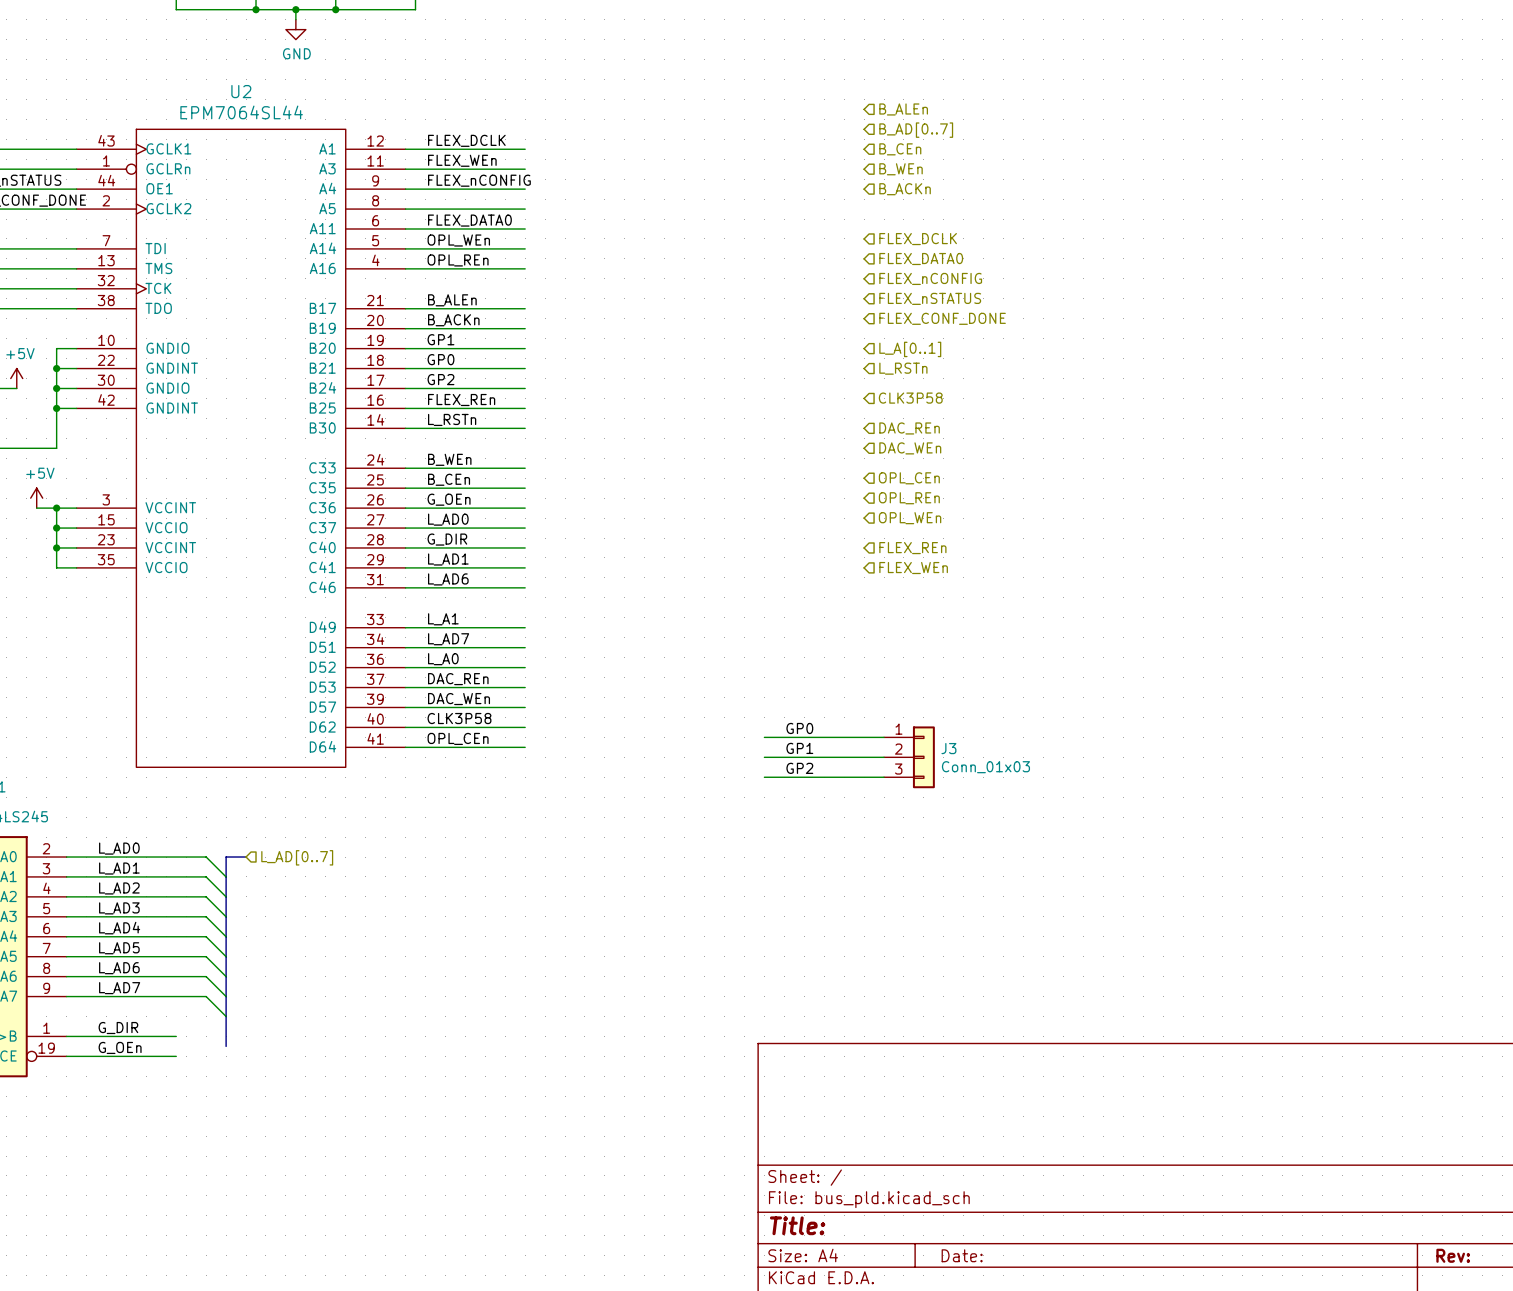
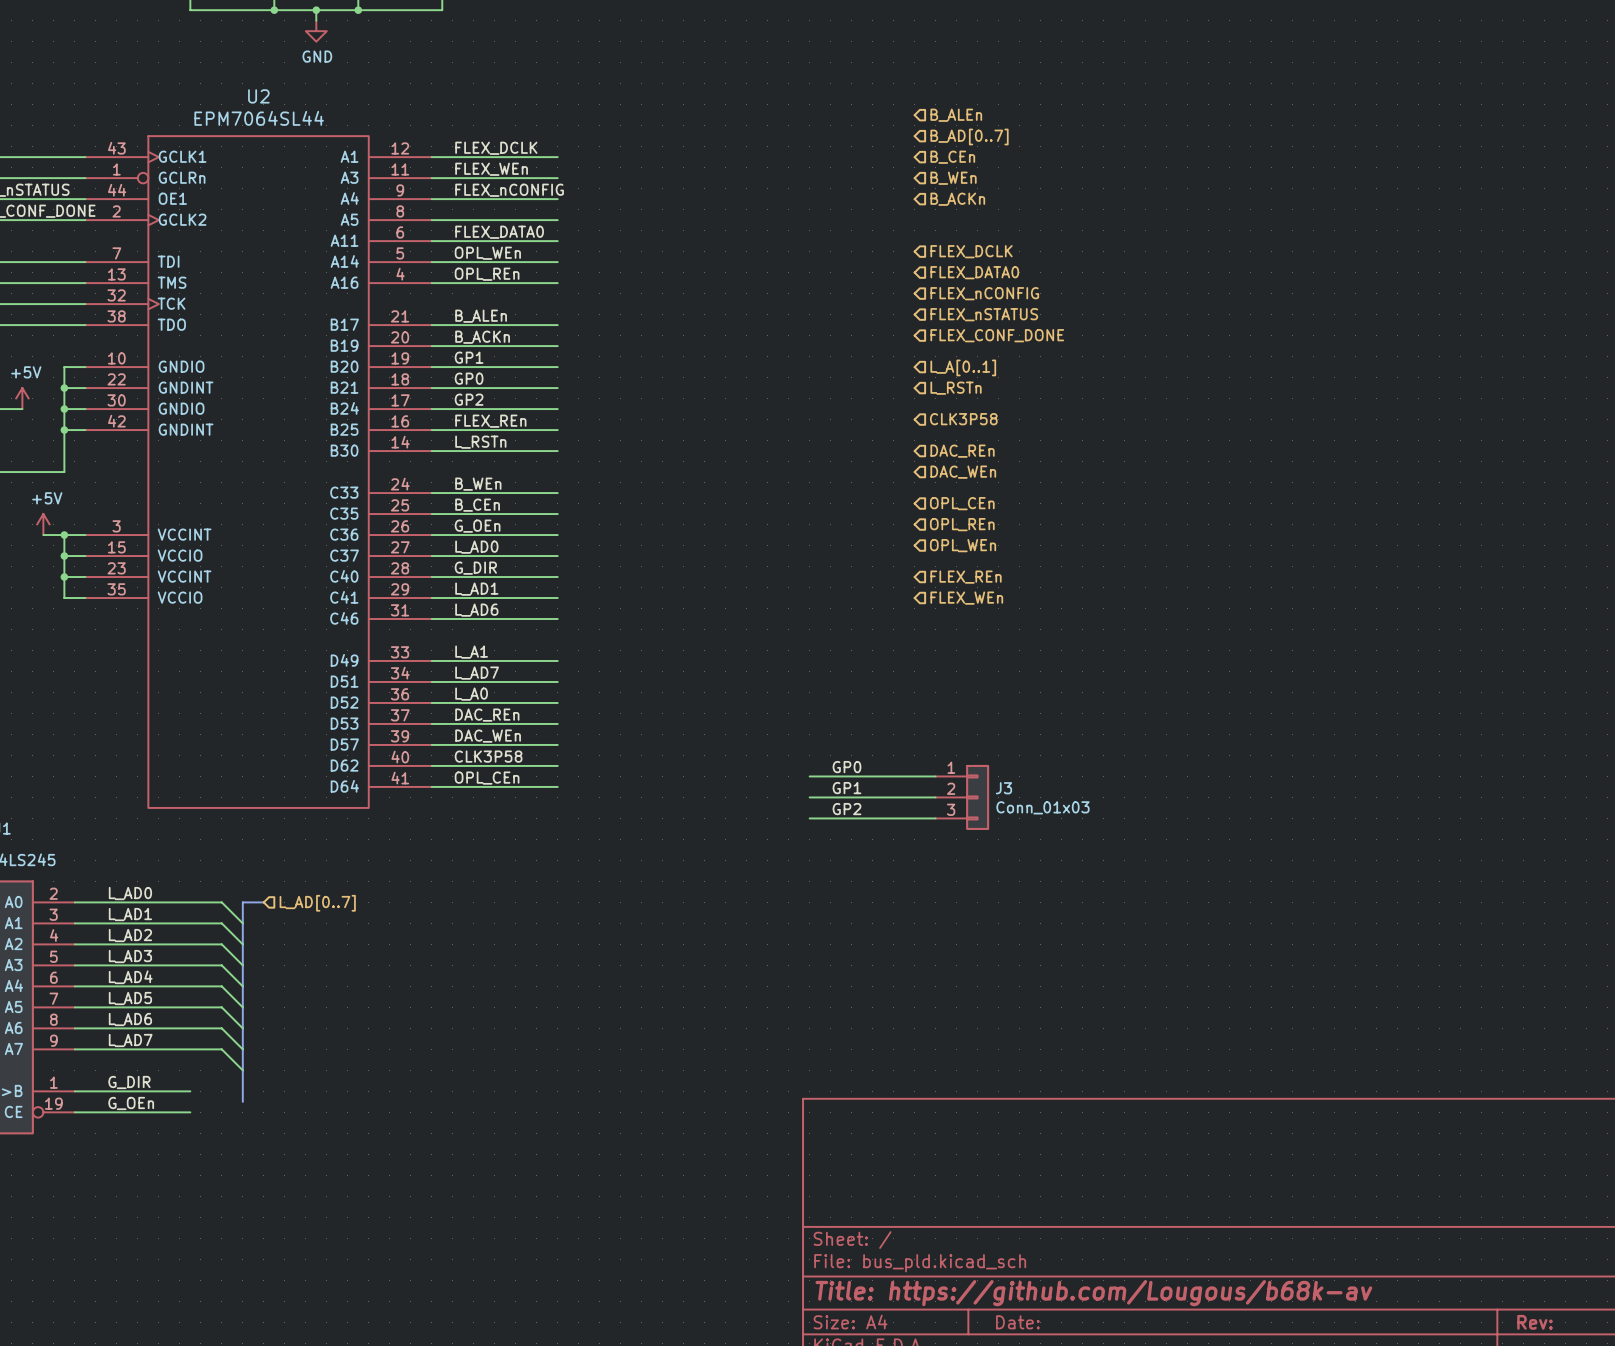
title block: Title: (797, 1225) -> Title: https://github.com/Lougous/b68k-av (1093, 1293)

